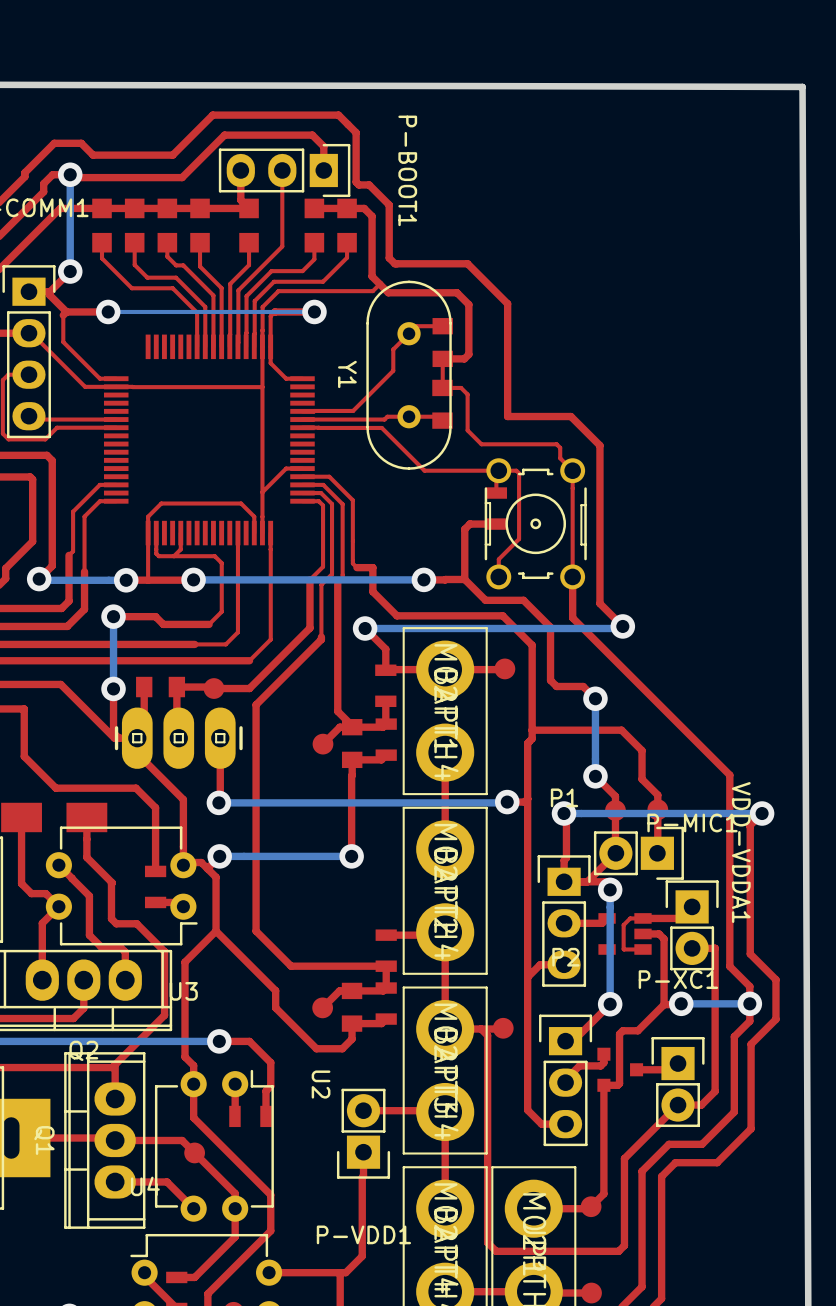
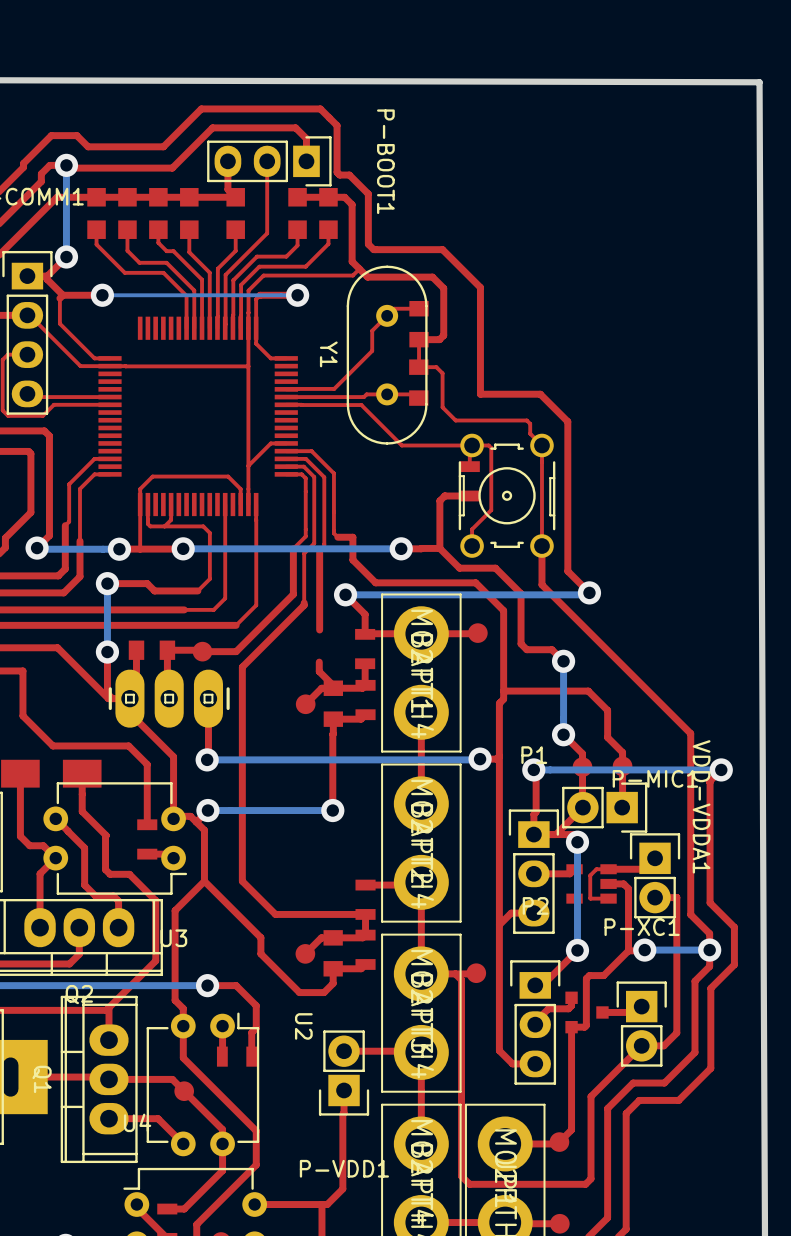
top track: (337, 665) (337, 711) (352, 725) -> (319, 662) (319, 671) (333, 686)

